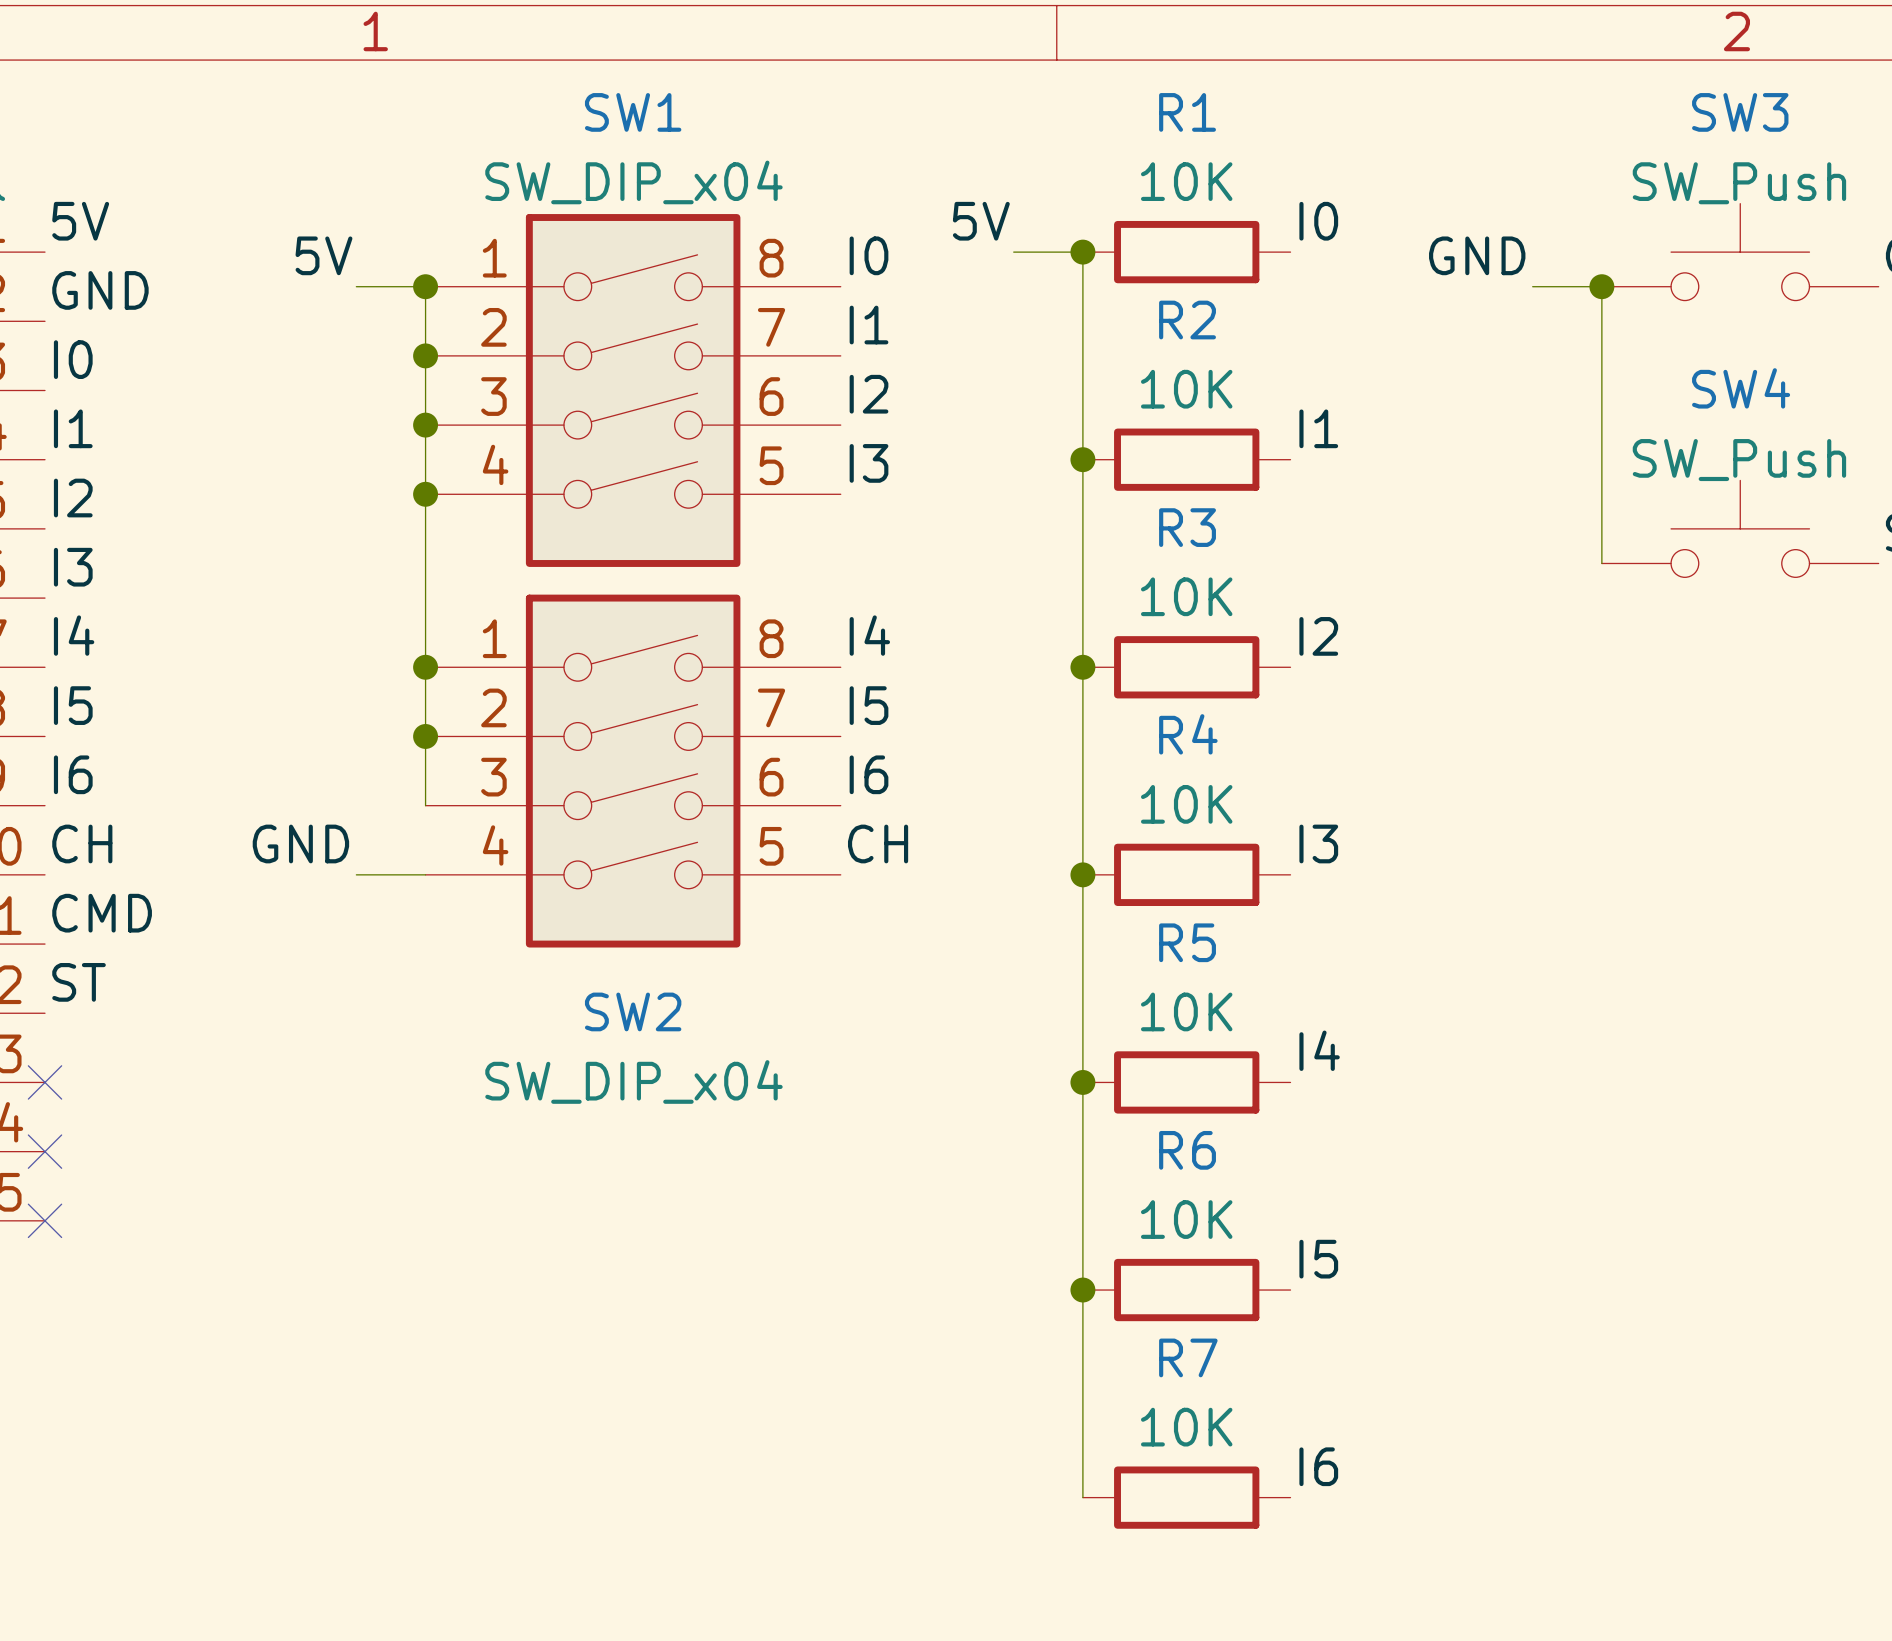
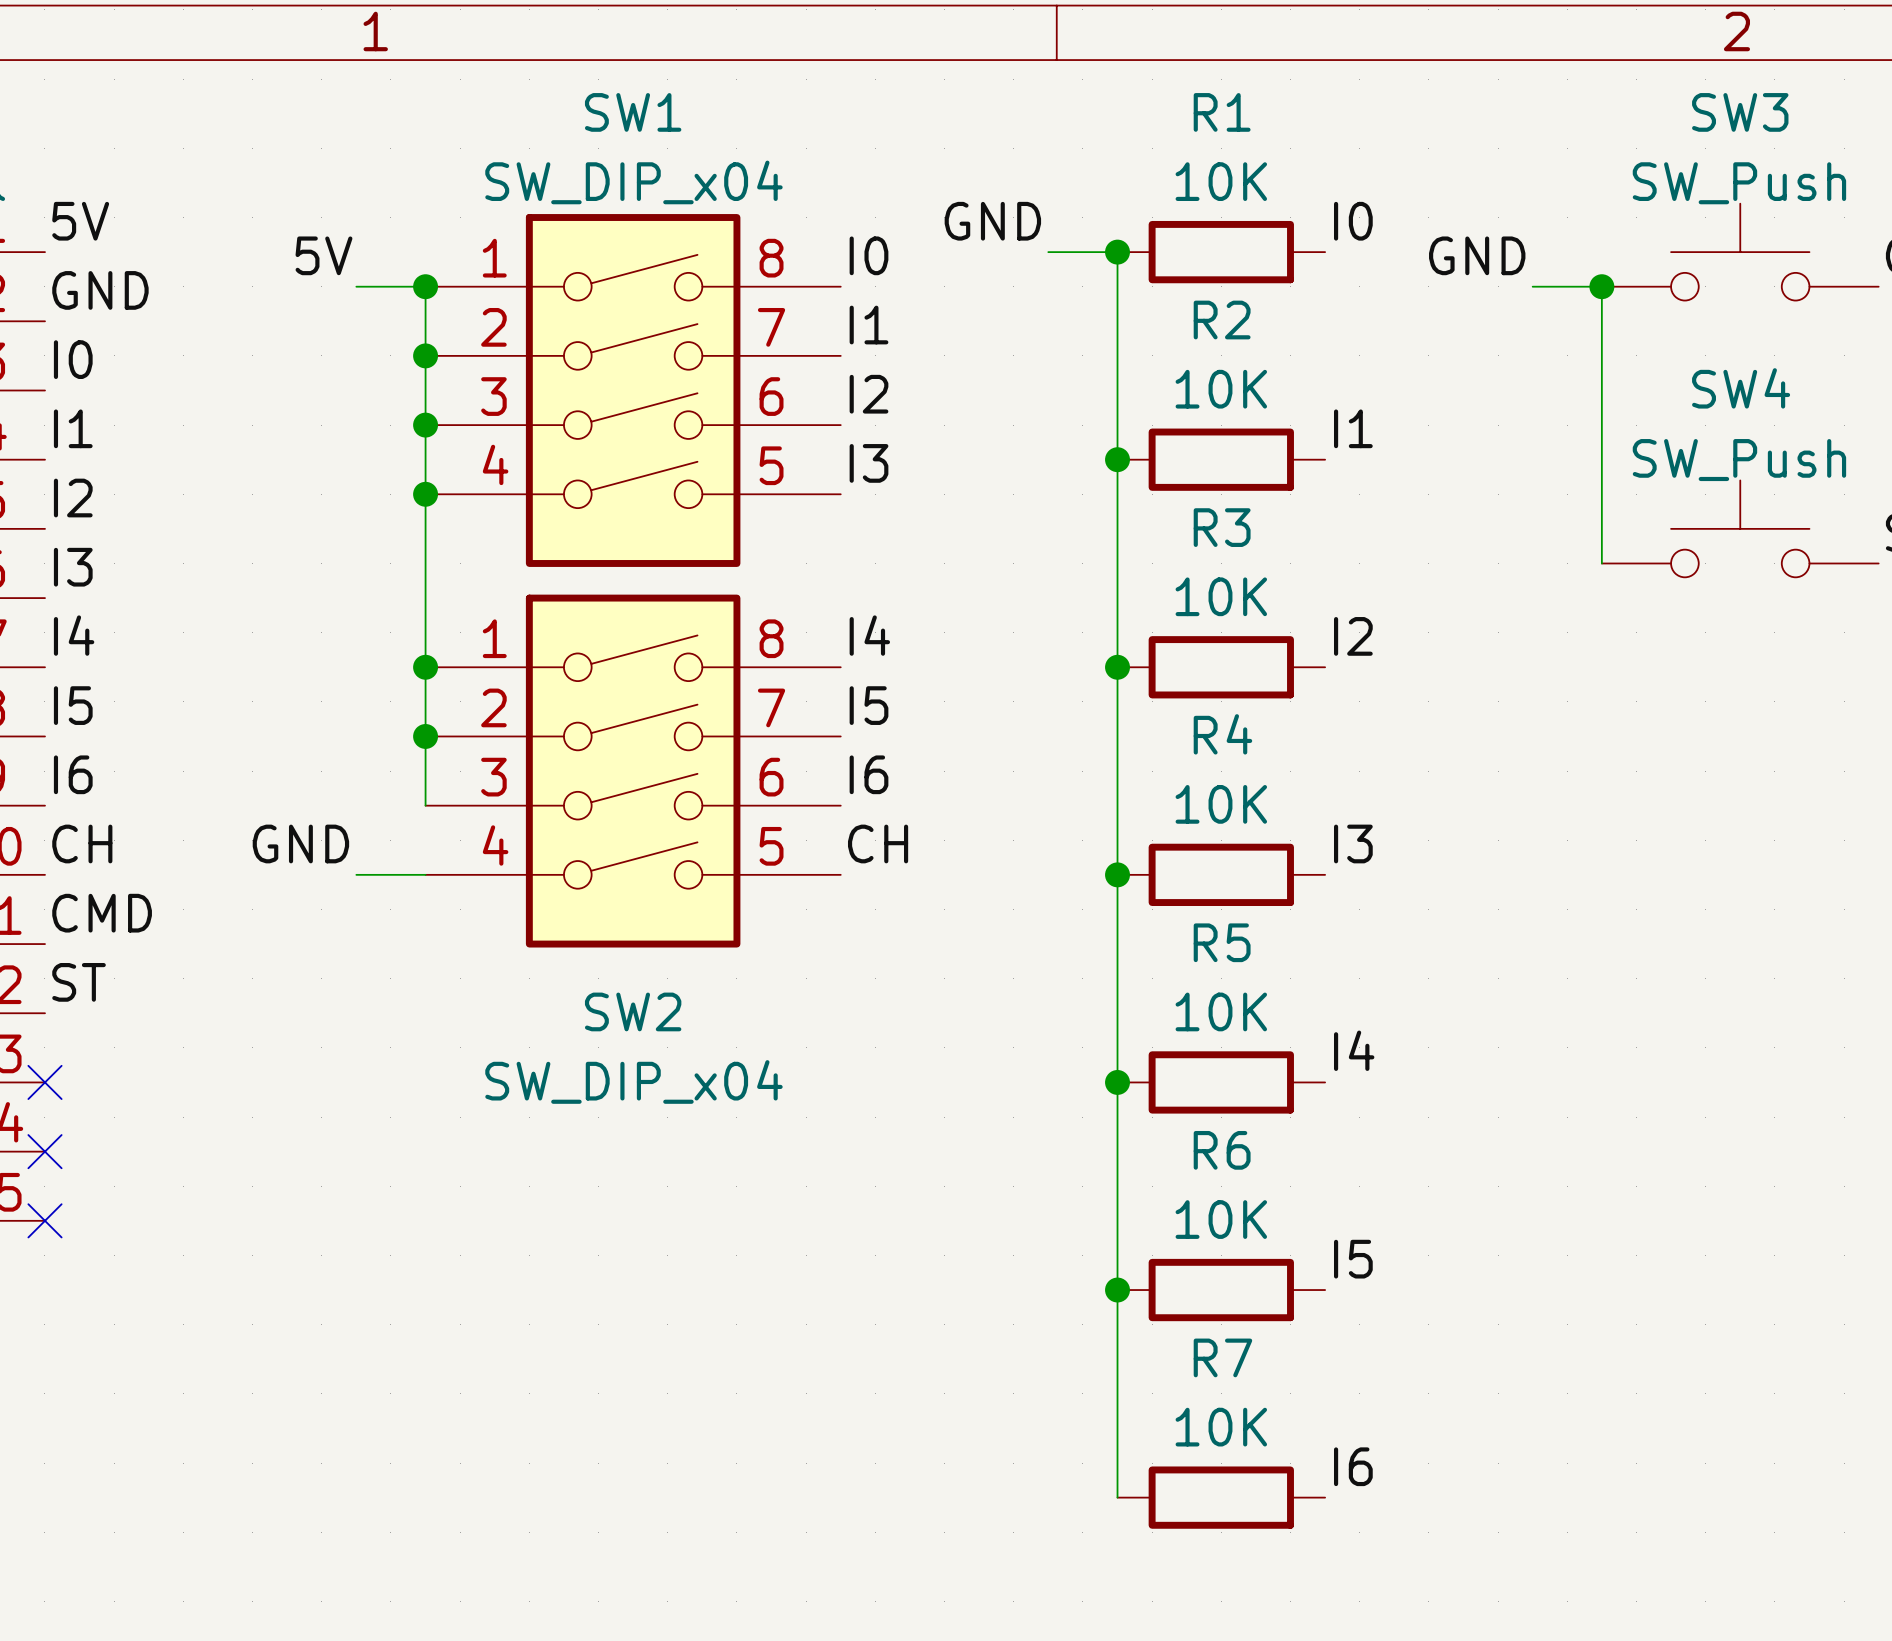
label: 5V (981, 221) -> none
label: none -> GND (992, 221)
label position: I0 (1318, 221) -> I0 (1353, 221)
wire: (1013, 252) (1048, 252) -> none
wire: (1082, 252) (1082, 1497) -> (1082, 252) (1117, 252) (1117, 1497)
junction position: (1082, 252) -> (1117, 252)
R1 position: (1186, 252) -> (1221, 252)
label position: I1 (1318, 428) -> I1 (1353, 428)
junction position: (1082, 459) -> (1117, 459)
R2 position: (1186, 459) -> (1221, 459)
label position: I2 (1318, 636) -> I2 (1353, 636)
junction position: (1082, 667) -> (1117, 667)
R3 position: (1186, 667) -> (1221, 667)
label position: I3 (1318, 843) -> I3 (1353, 843)
junction position: (1082, 874) -> (1117, 874)
R4 position: (1186, 874) -> (1221, 874)
label position: I4 (1319, 1050) -> I4 (1354, 1050)
junction position: (1082, 1082) -> (1117, 1082)
R5 position: (1186, 1082) -> (1221, 1082)
label position: I5 (1318, 1259) -> I5 (1353, 1259)
junction position: (1082, 1290) -> (1117, 1290)
R6 position: (1186, 1290) -> (1221, 1290)
label position: I6 (1318, 1466) -> I6 (1353, 1466)
R7 position: (1186, 1497) -> (1221, 1497)

